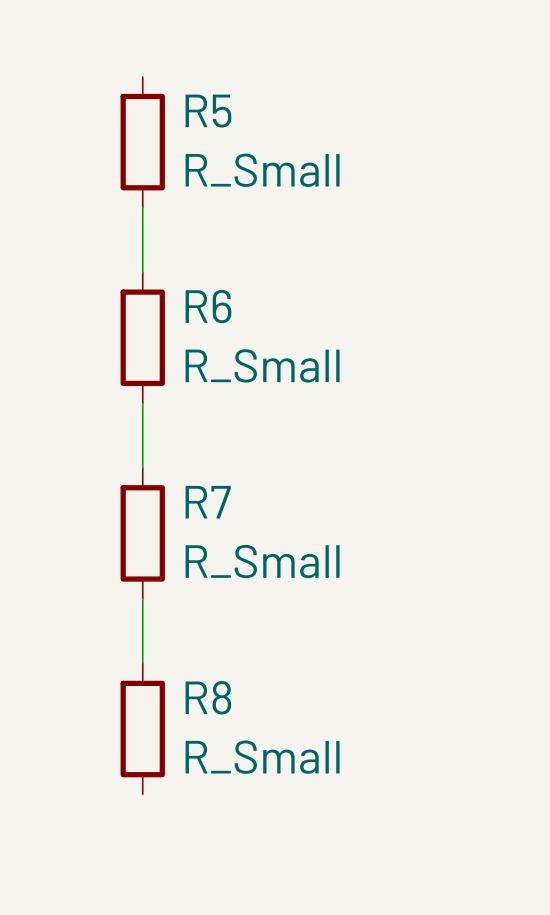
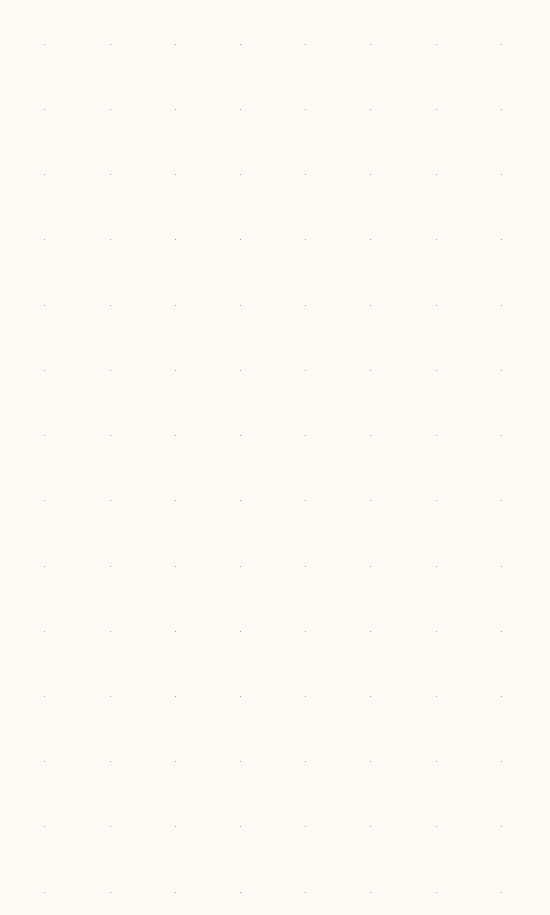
R5: R_Small (142, 142) -> none
wire: (142, 207) (142, 272) -> none
R6: R_Small (142, 337) -> none
wire: (142, 402) (142, 468) -> none
R7: R_Small (142, 533) -> none
wire: (142, 598) (142, 663) -> none
R8: R_Small (142, 729) -> none

